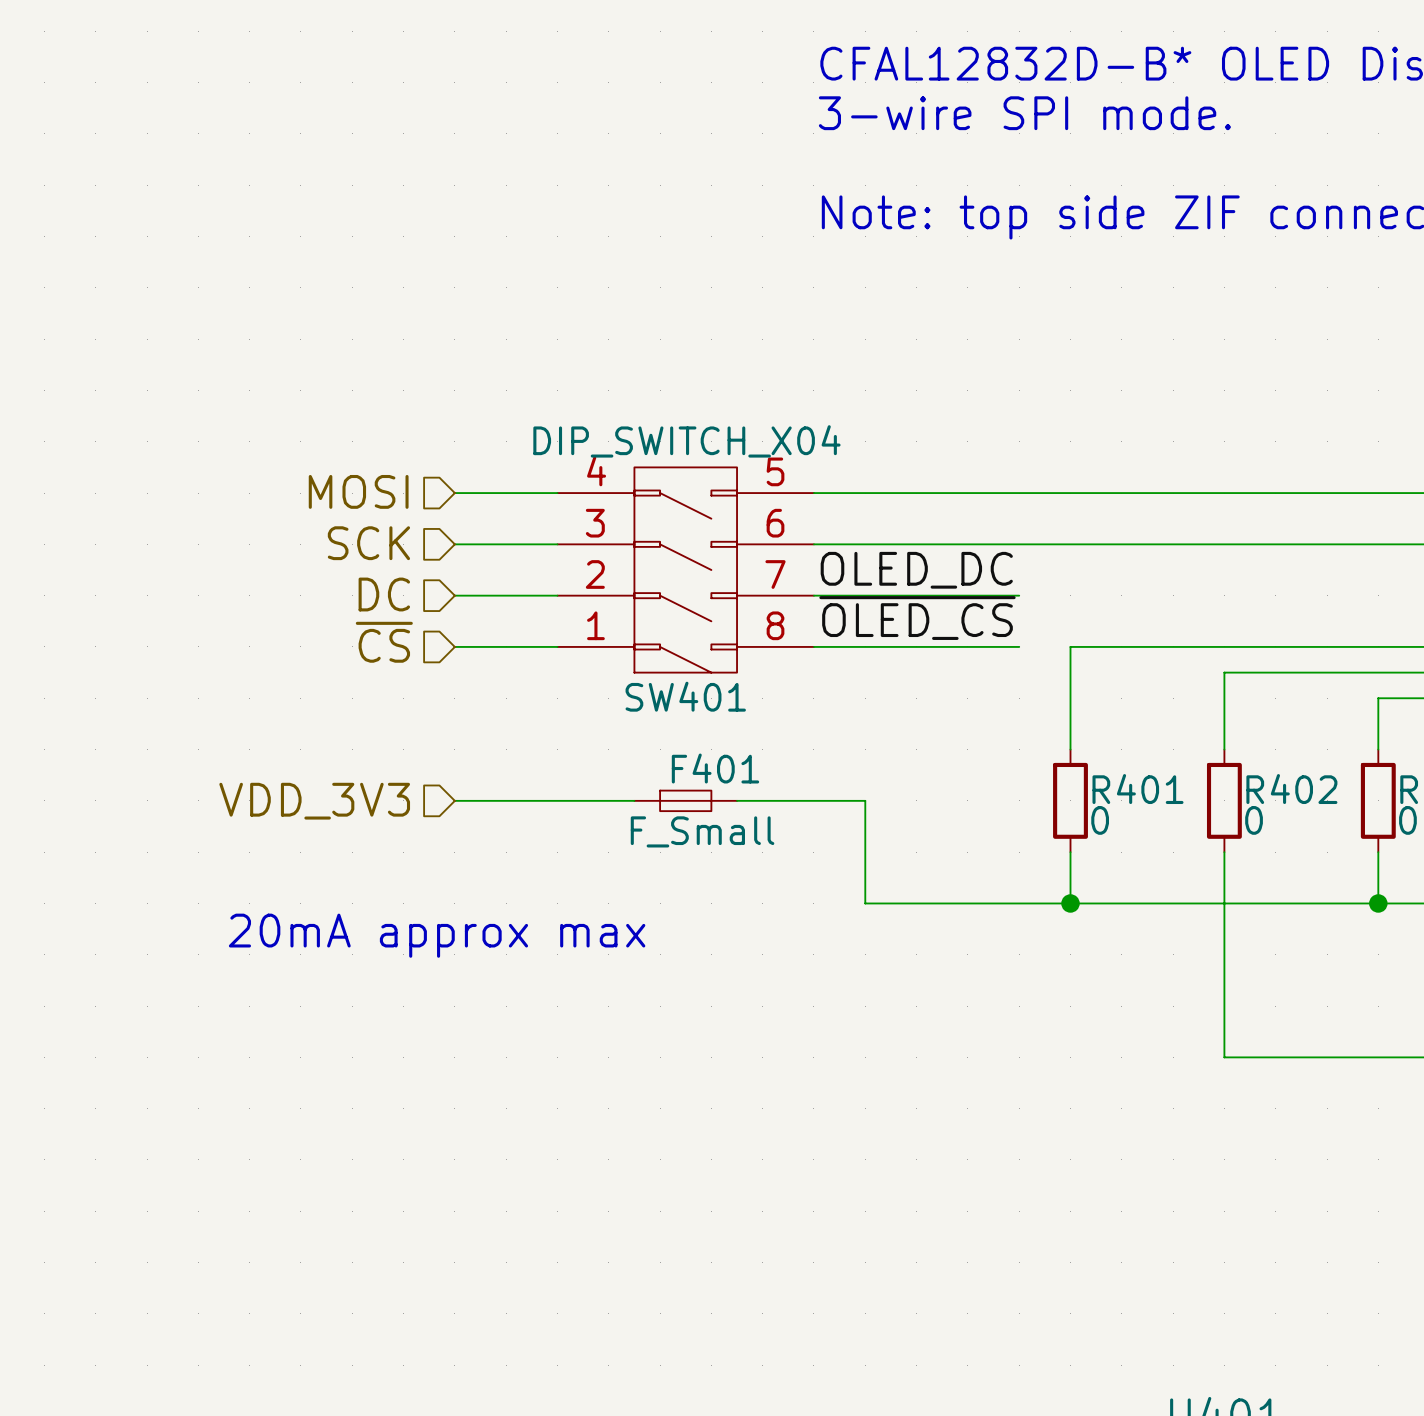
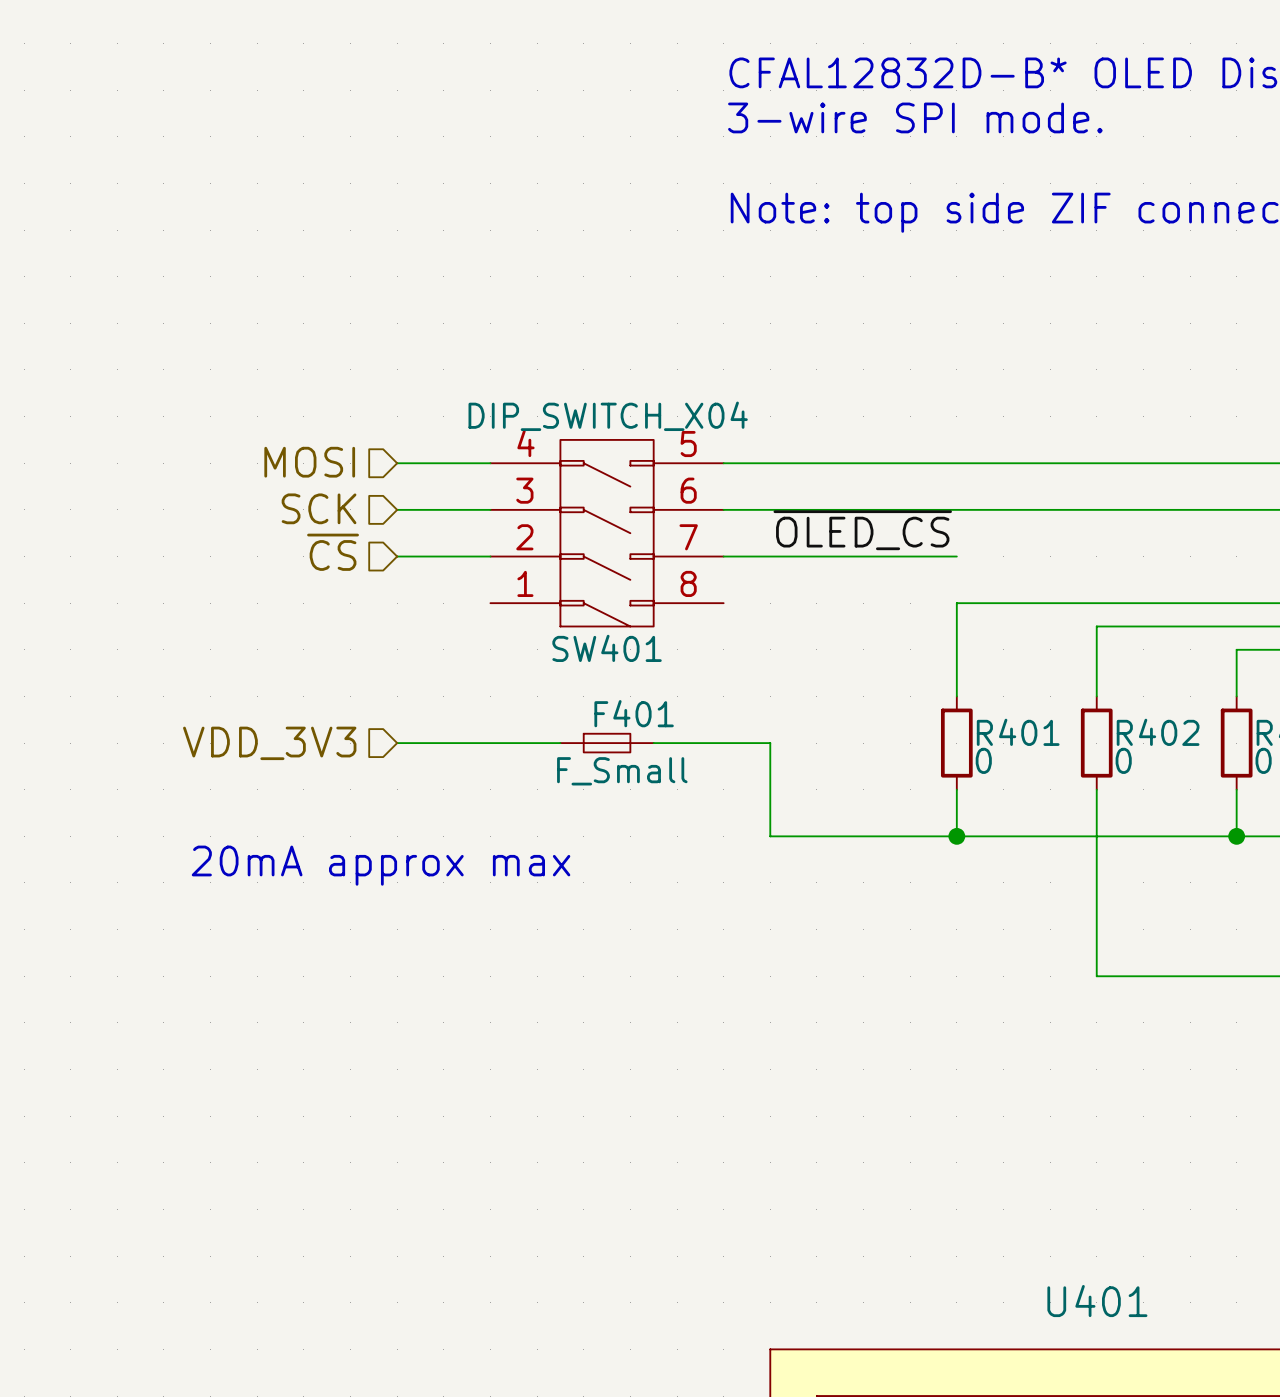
label: OLED_DC (916, 570) -> none
hierarchical label: DC (384, 594) -> ~{CS} (333, 552)
wire: none -> (910, 556) (956, 556)
label position: ~{OLED_CS} (917, 618) -> ~{OLED_CS} (862, 530)
hierarchical label: ~{CS} (384, 642) -> none
wire: (454, 646) (557, 646) -> none
wire: (813, 646) (1019, 646) -> none

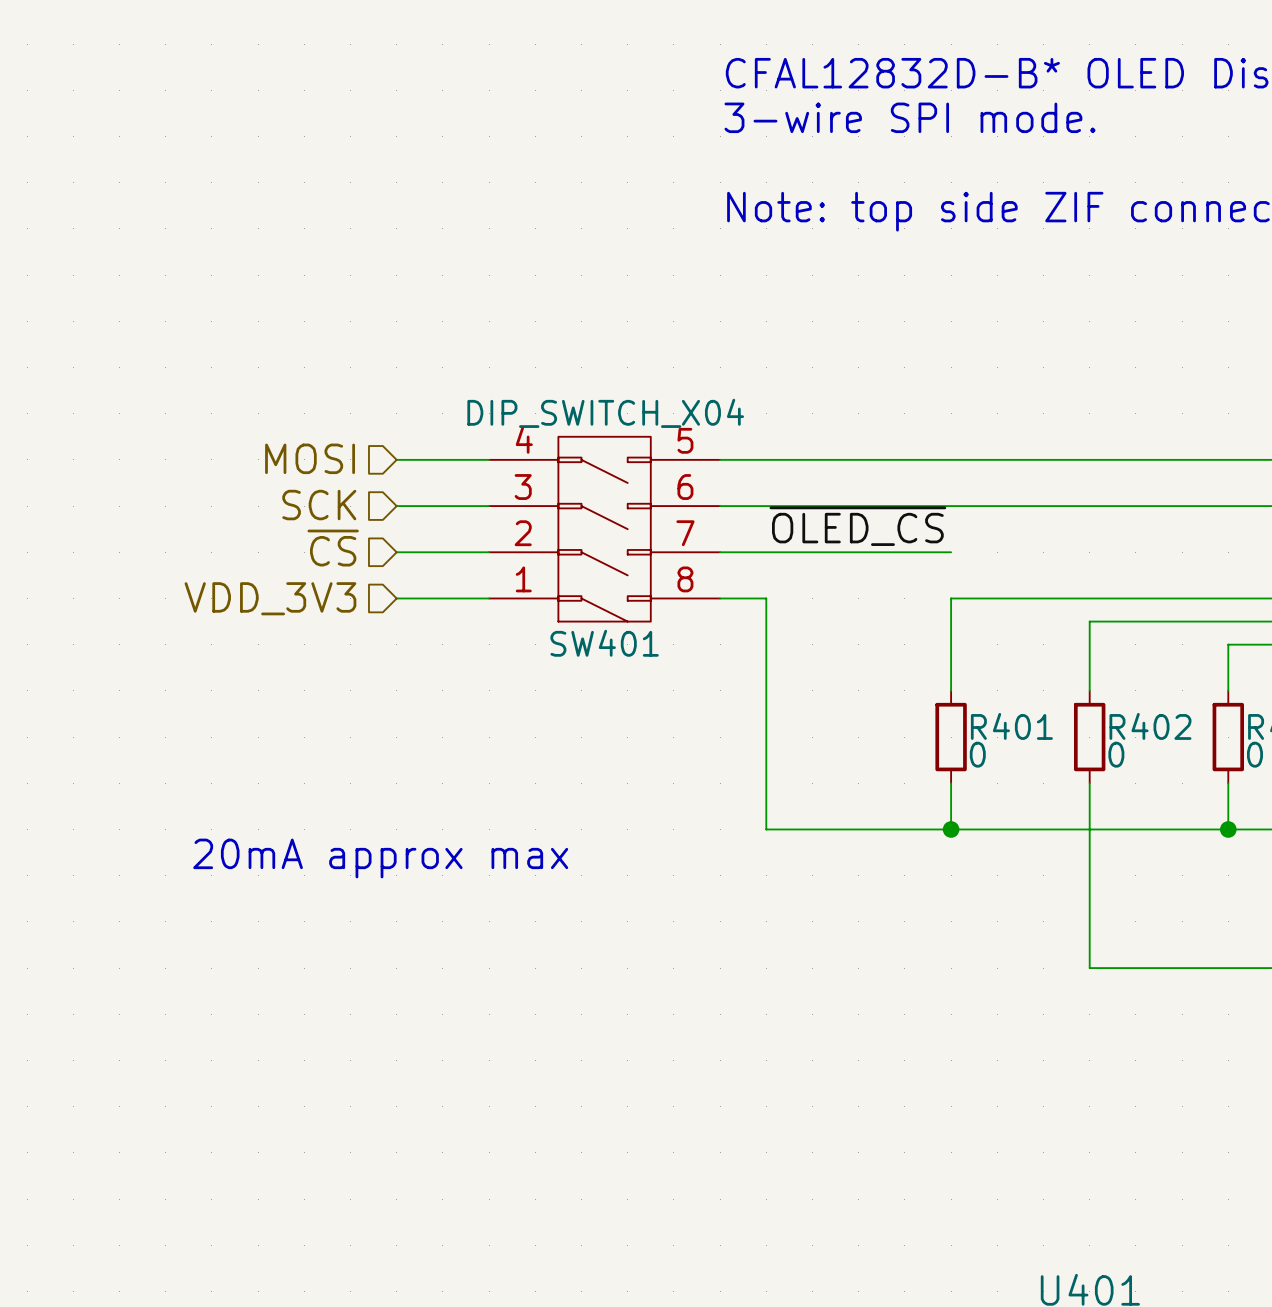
wire: none -> (396, 598) (489, 598)
hierarchical label position: VDD_3V3 (269, 743) -> VDD_3V3 (270, 598)
wire: (397, 743) (560, 743) -> none
F401: F_Small (607, 743) -> none
wire: (653, 743) (770, 743) -> (720, 598) (766, 598) (766, 737)

